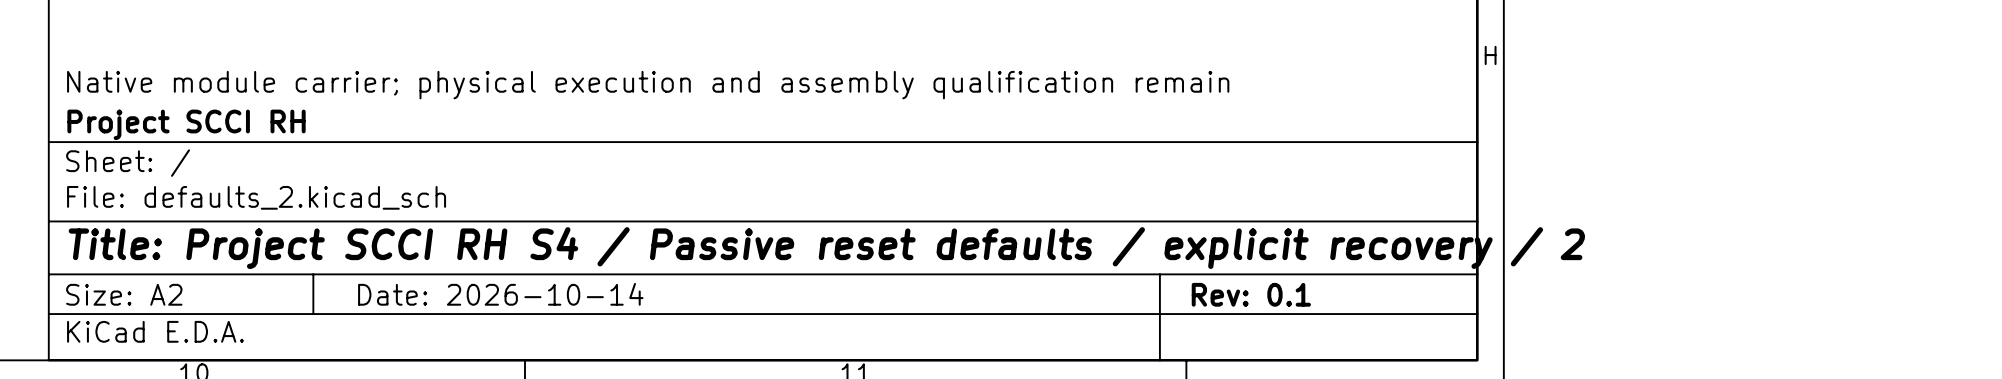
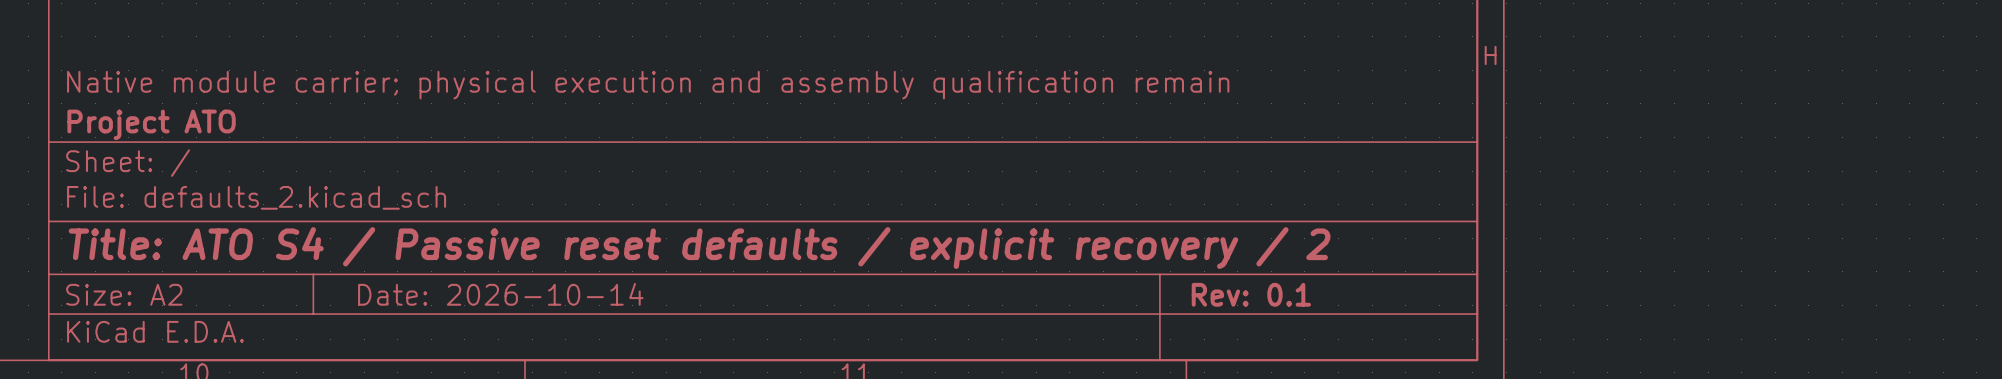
title block: Project SCCI RH (186, 124) -> Project ATO (151, 124)
title block: Title: Project SCCI RH S4 / Passive reset defaults / explicit recovery / 2 (826, 248) -> Title: ATO S4 / Passive reset defaults / explicit recovery / 2 (699, 248)

